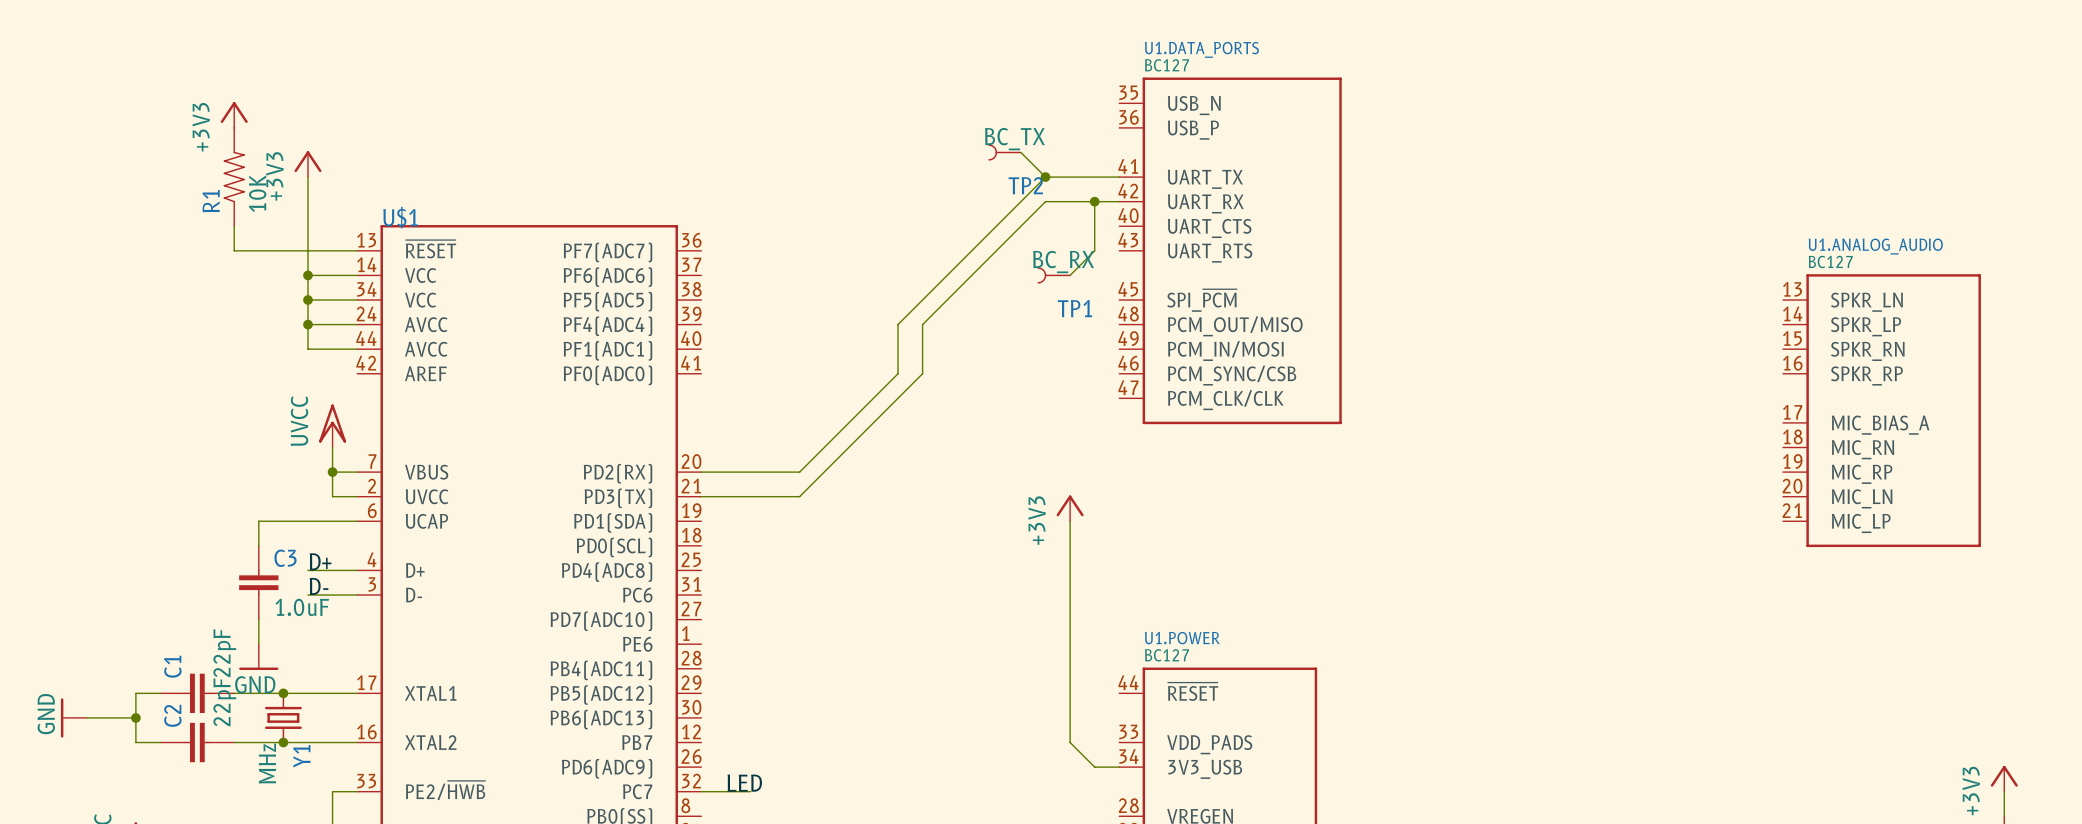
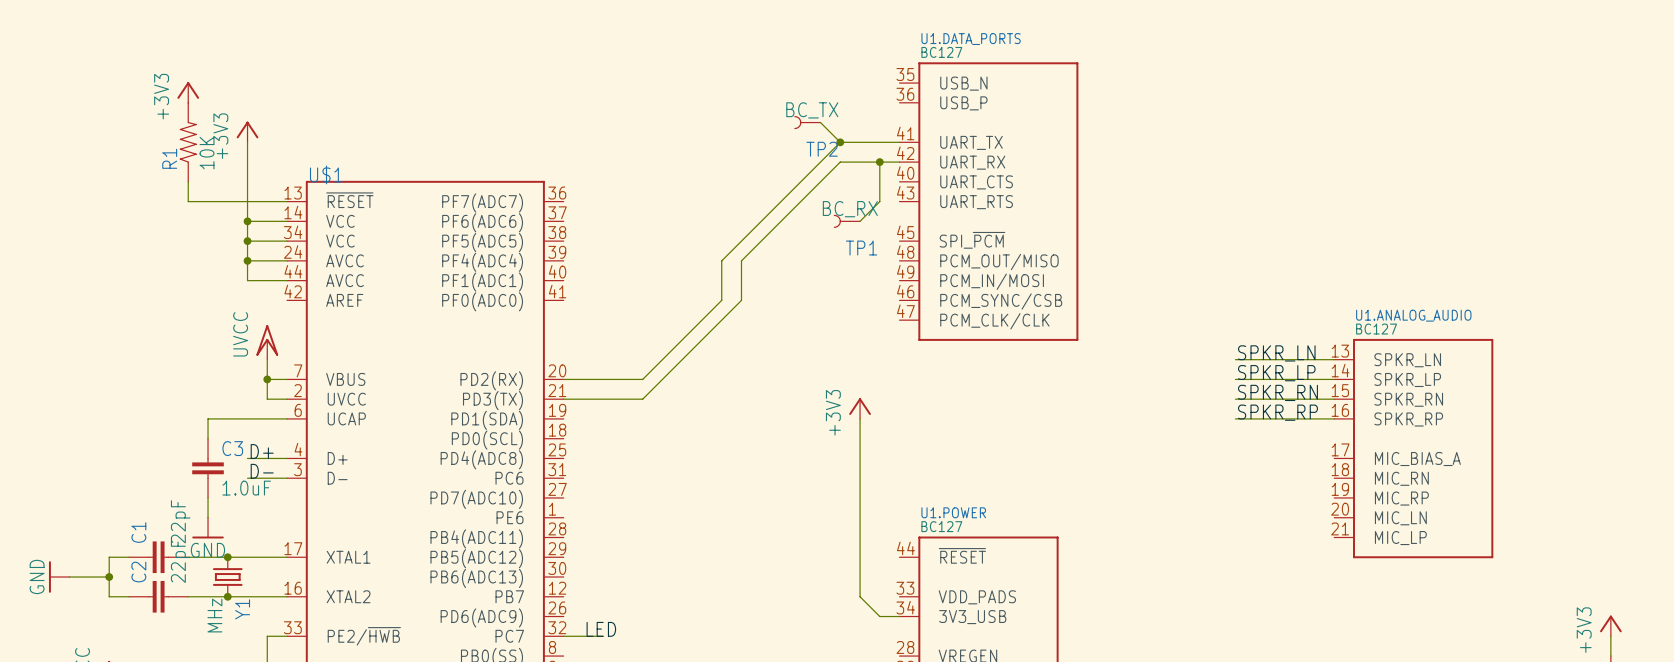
U1.ANALOG_AUDIO position: (1881, 410) -> (1413, 448)
label: none -> SPKR_LN (1276, 353)
wire: none -> (1235, 359) (1334, 359)
label: none -> SPKR_LP (1276, 373)
wire: none -> (1235, 379) (1334, 379)
label: none -> SPKR_RN (1277, 392)
wire: none -> (1235, 399) (1334, 399)
label: none -> SPKR_RP (1277, 412)
wire: none -> (1235, 418) (1334, 418)

